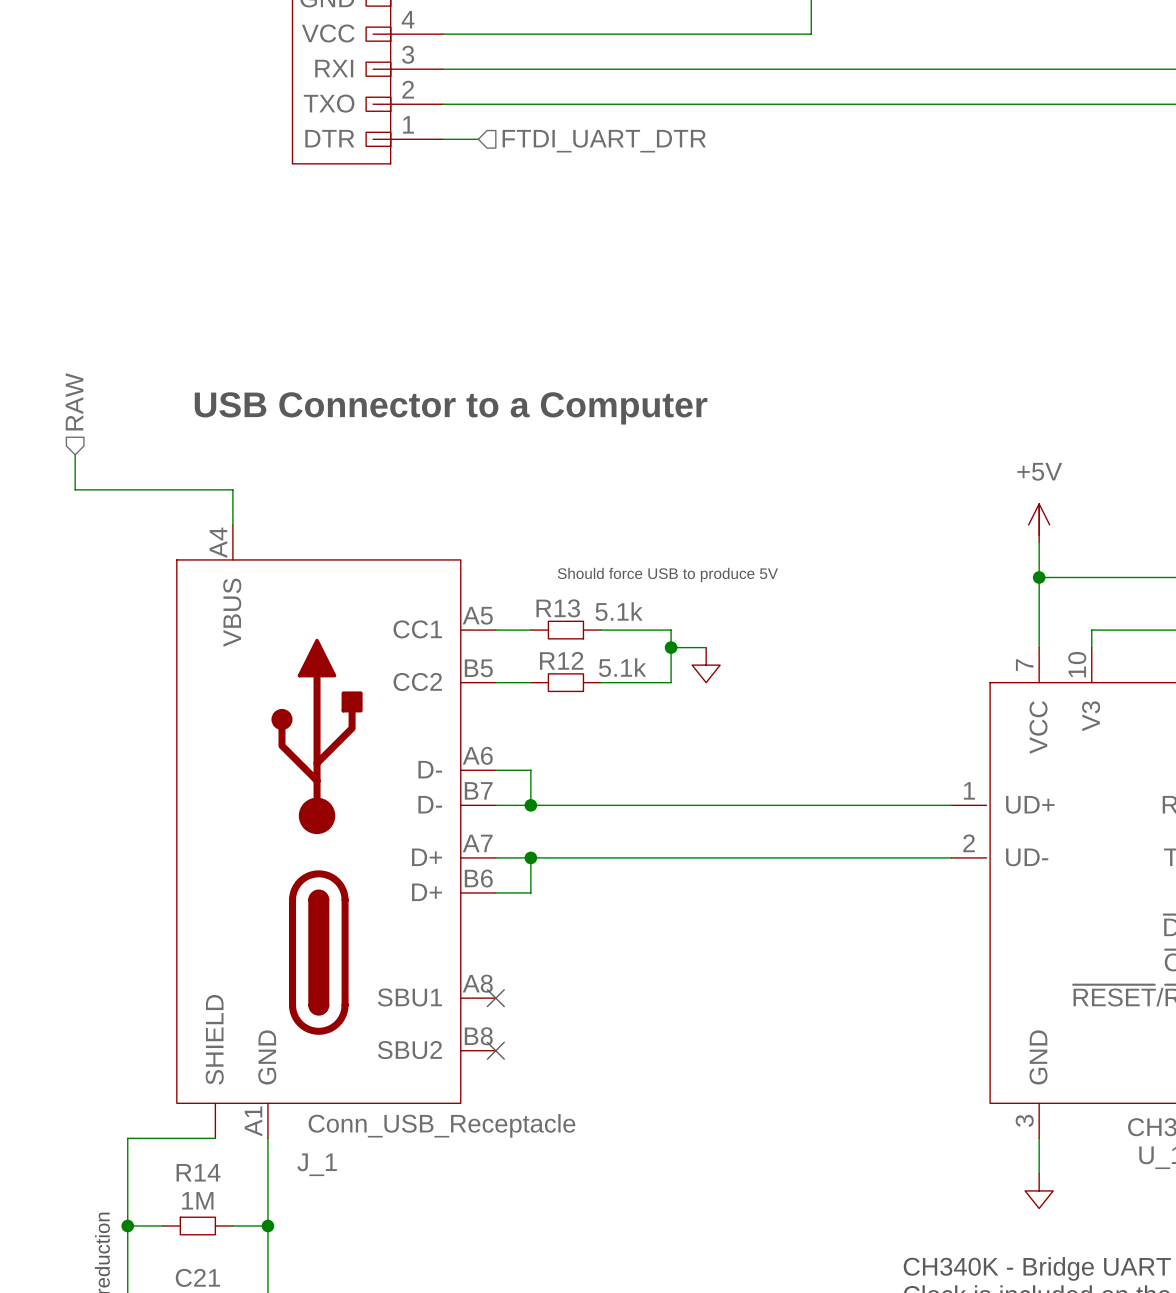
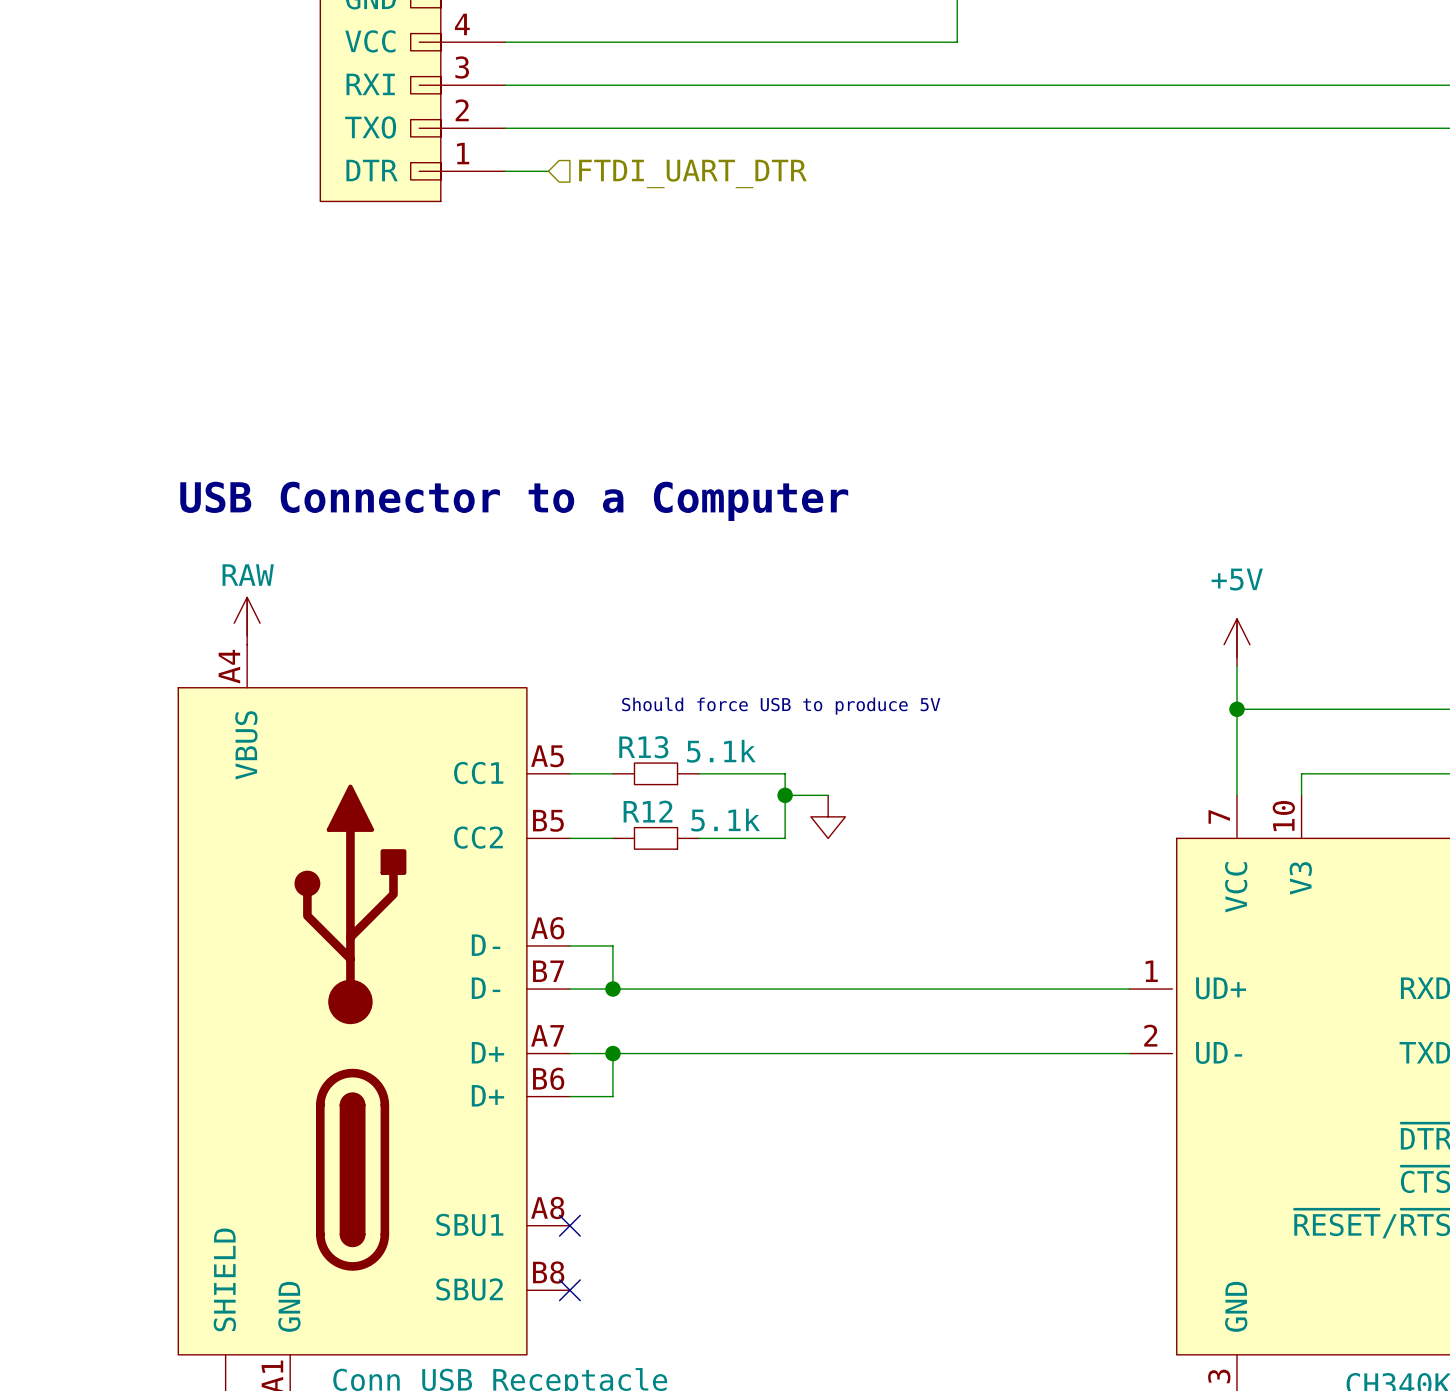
hierarchical label: RAW (74, 401) -> none
wire: (75, 454) (75, 489) (232, 489) (232, 524) -> none
power symbol: none -> RAW (247, 621)

